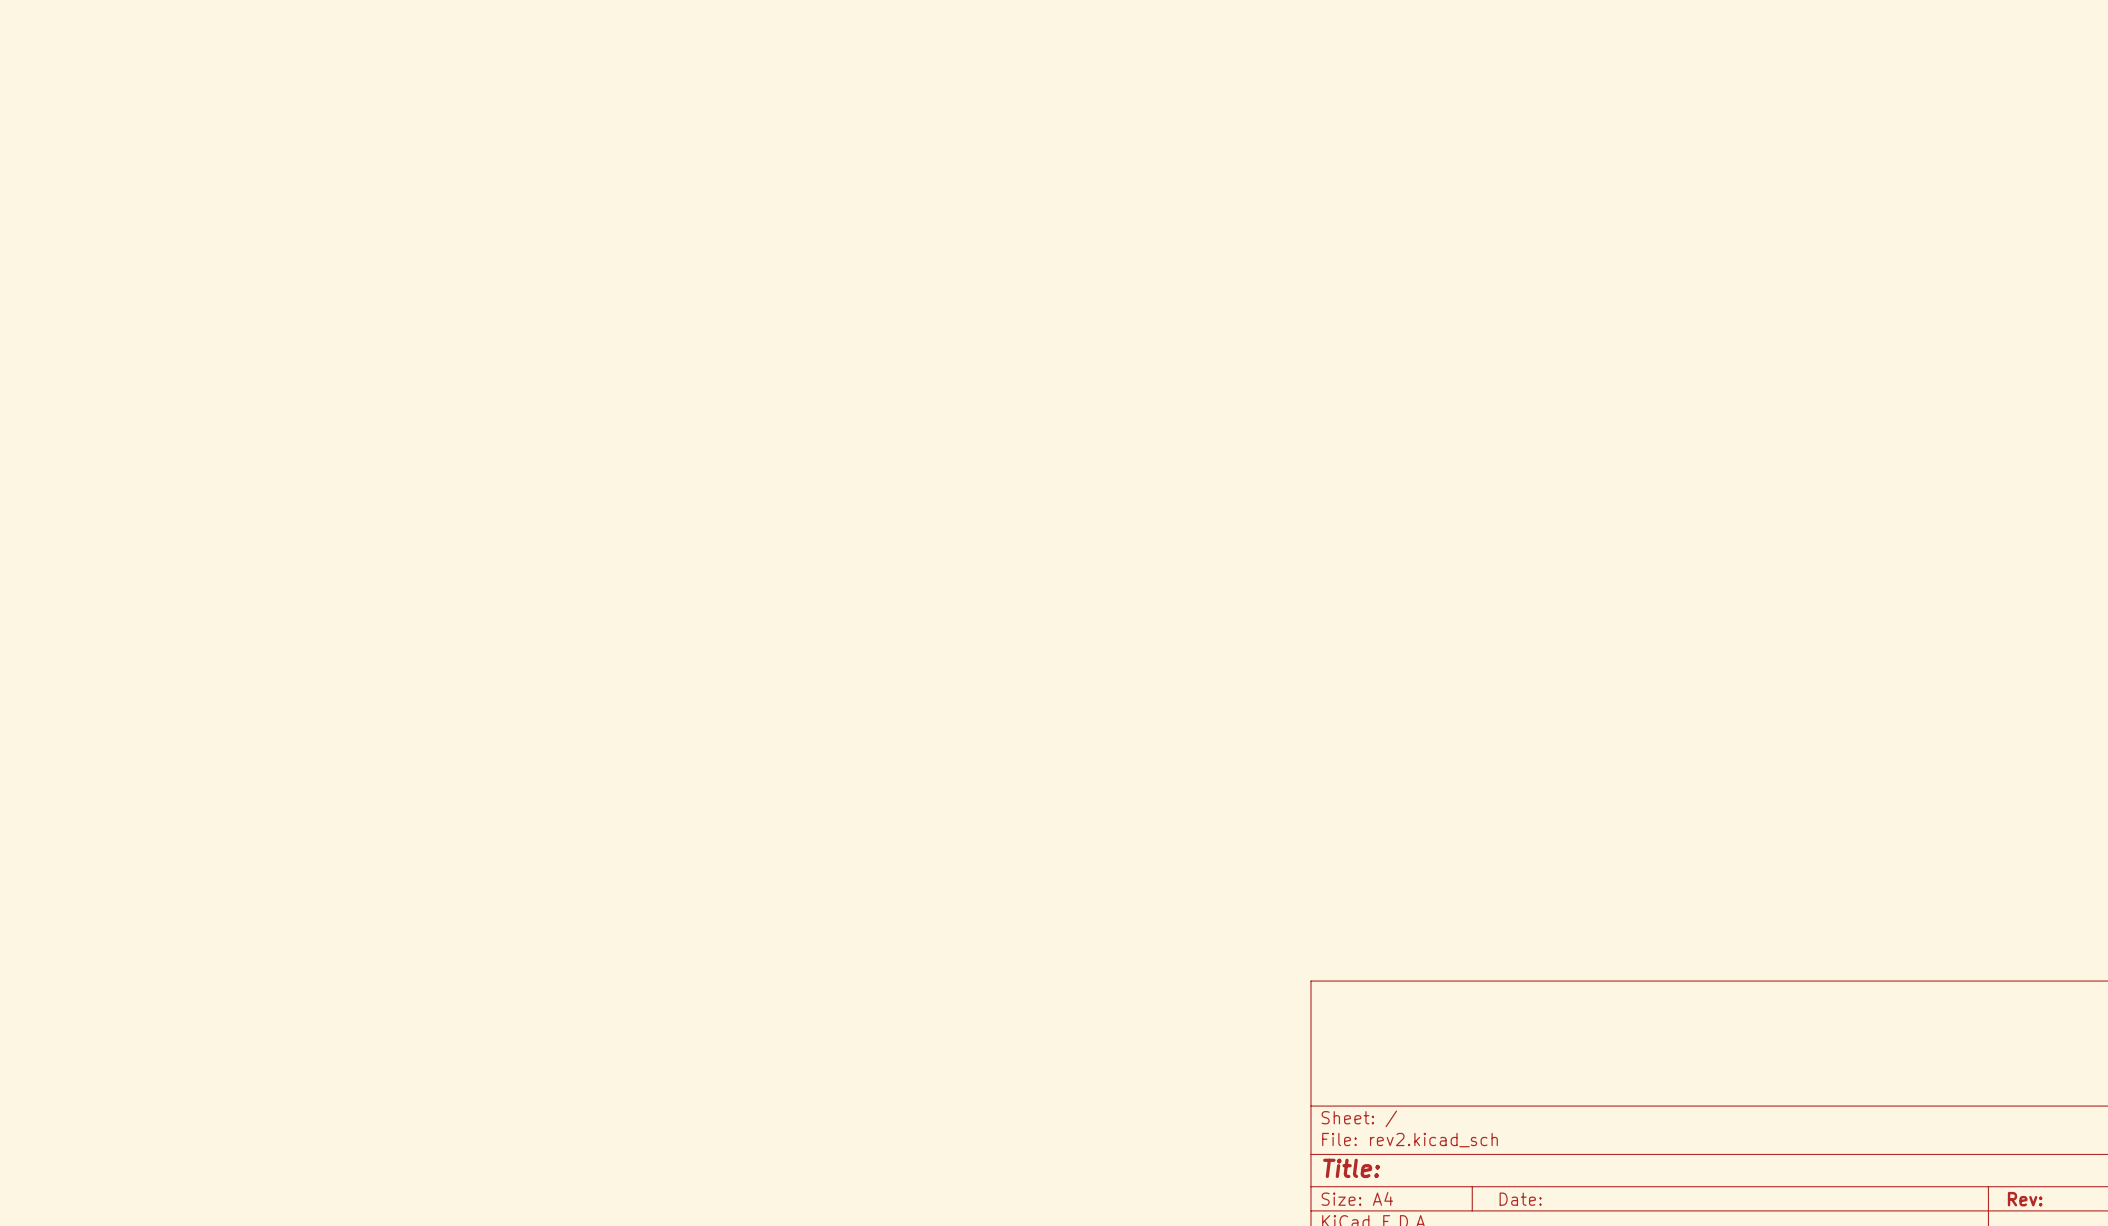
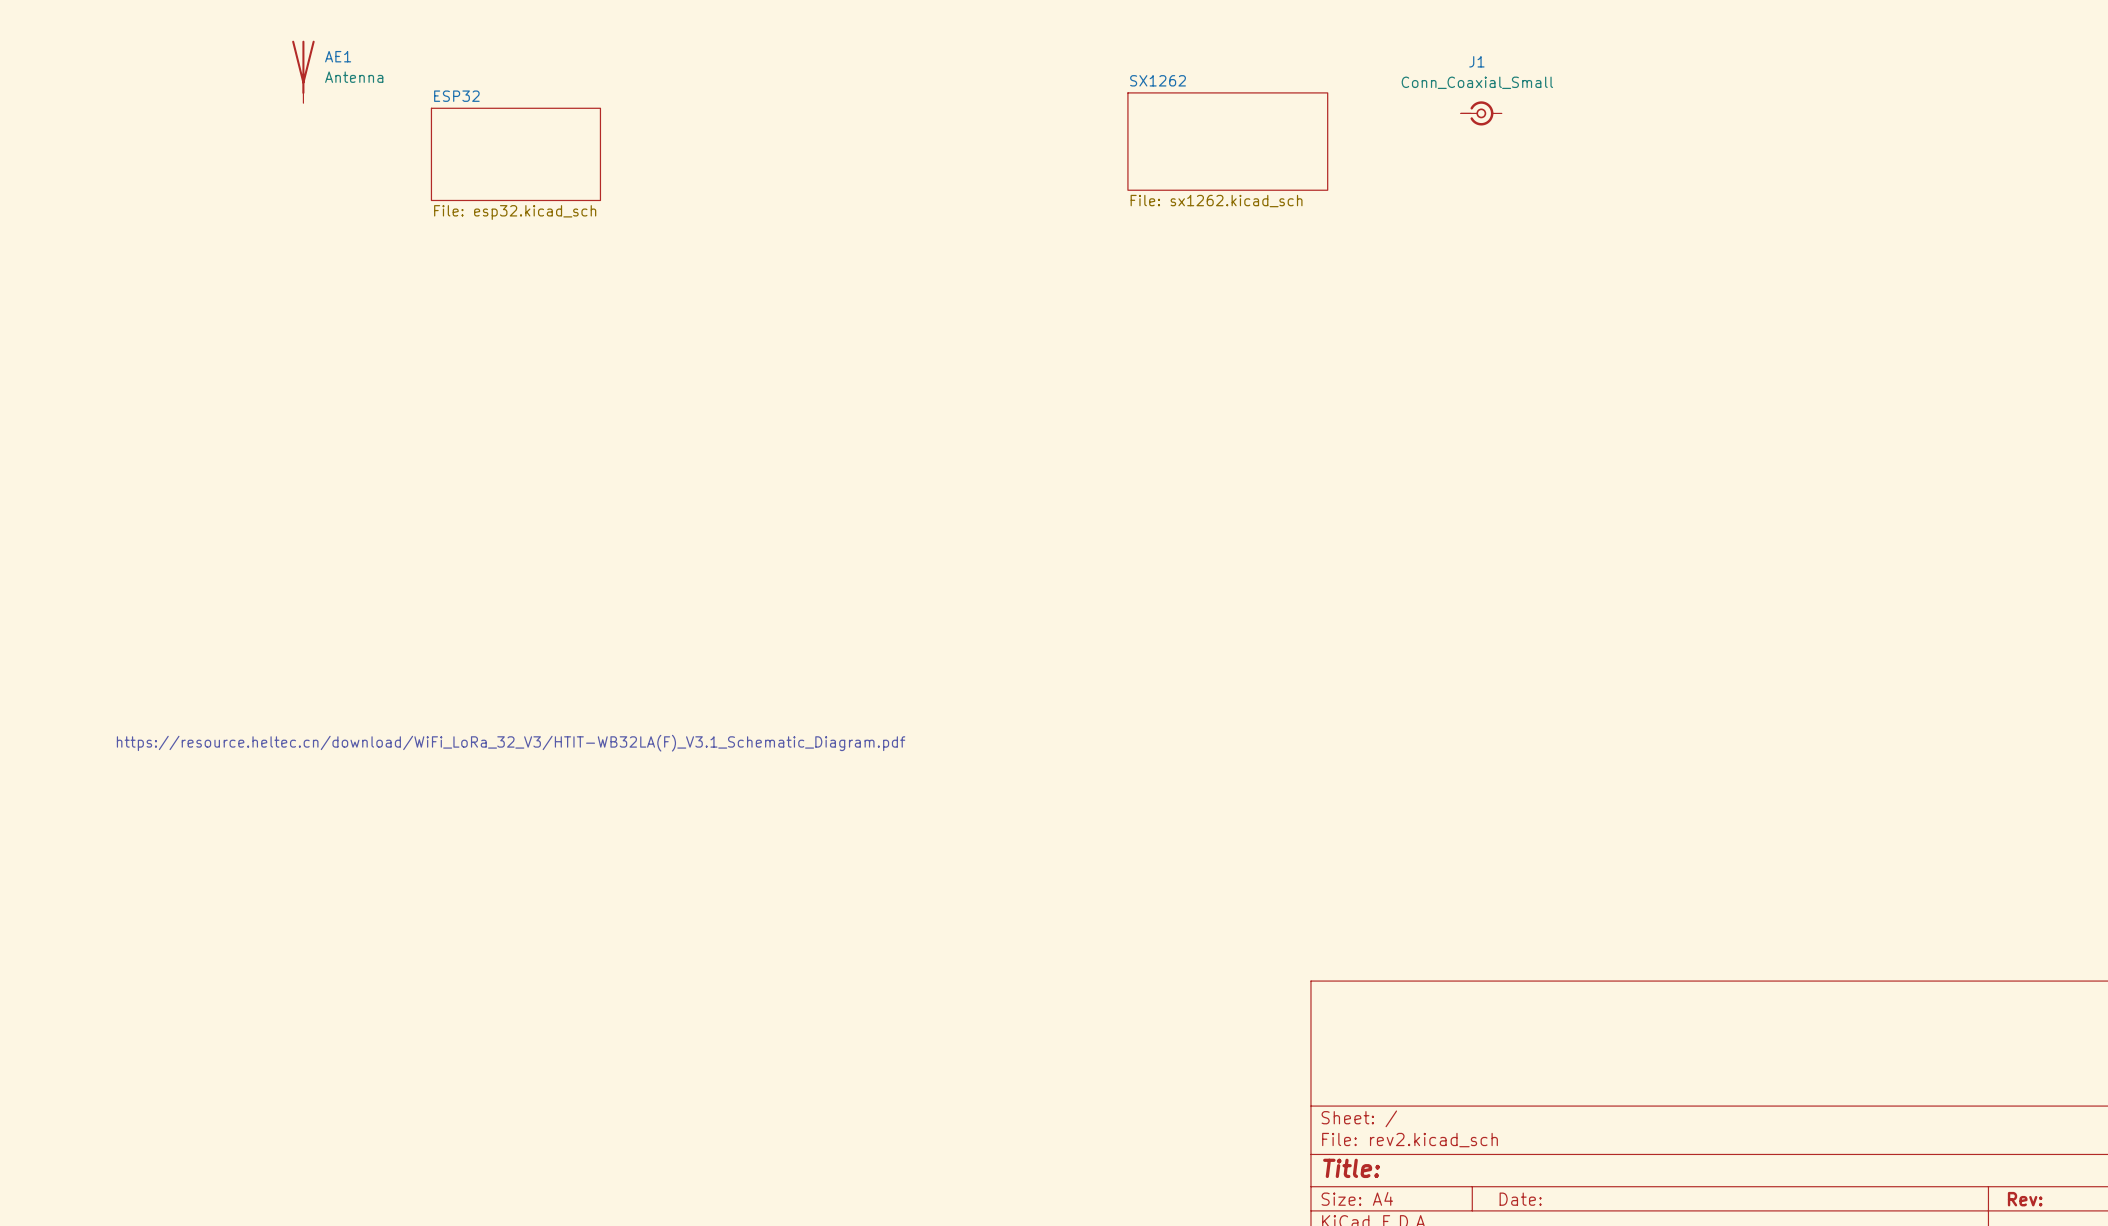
AE1: none -> Antenna (303, 71)
J1: none -> Conn_Coaxial_Small (1481, 113)
sheet SX1262: none -> File: sx1262.kicad_sch (1227, 141)
sheet ESP32: none -> File: esp32.kicad_sch (515, 154)
text: none -> https://resource.heltec.cn/download/WiFi_LoRa_32_V3/HTIT-WB32LA(F)_V3.1_Schematic_Diagram.pdf (511, 743)

